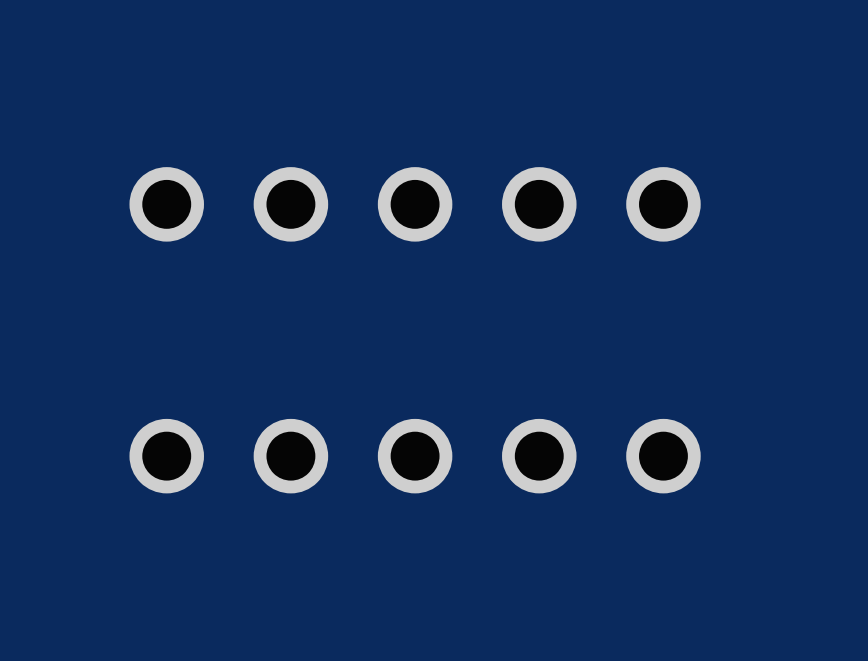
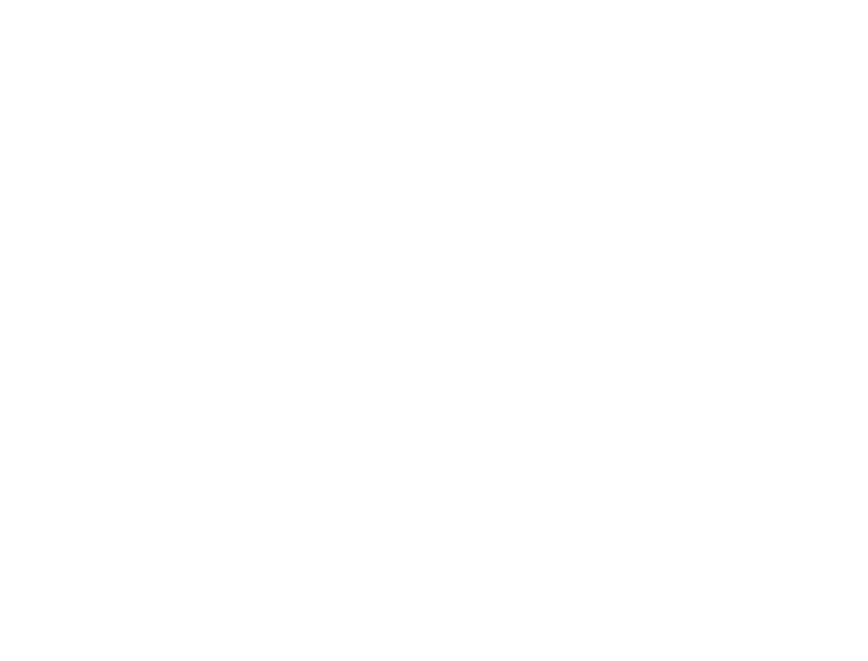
part: (415, 204) -> none
part: (415, 456) -> none

